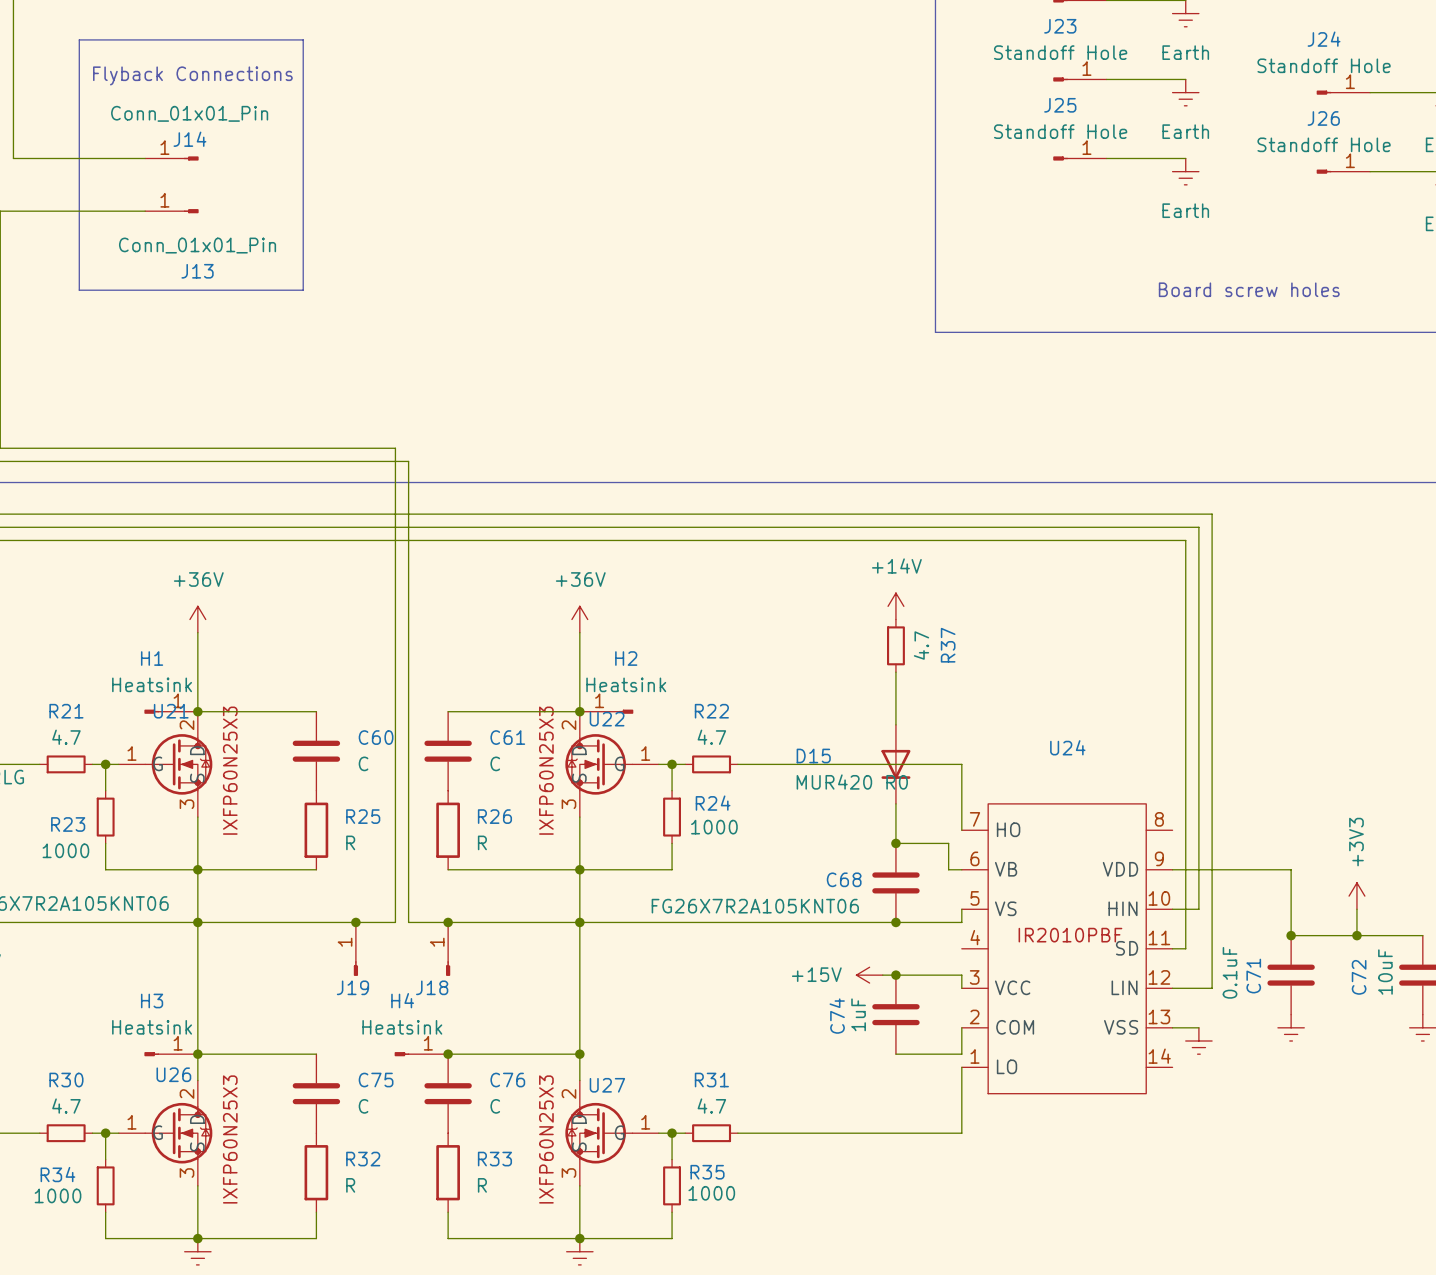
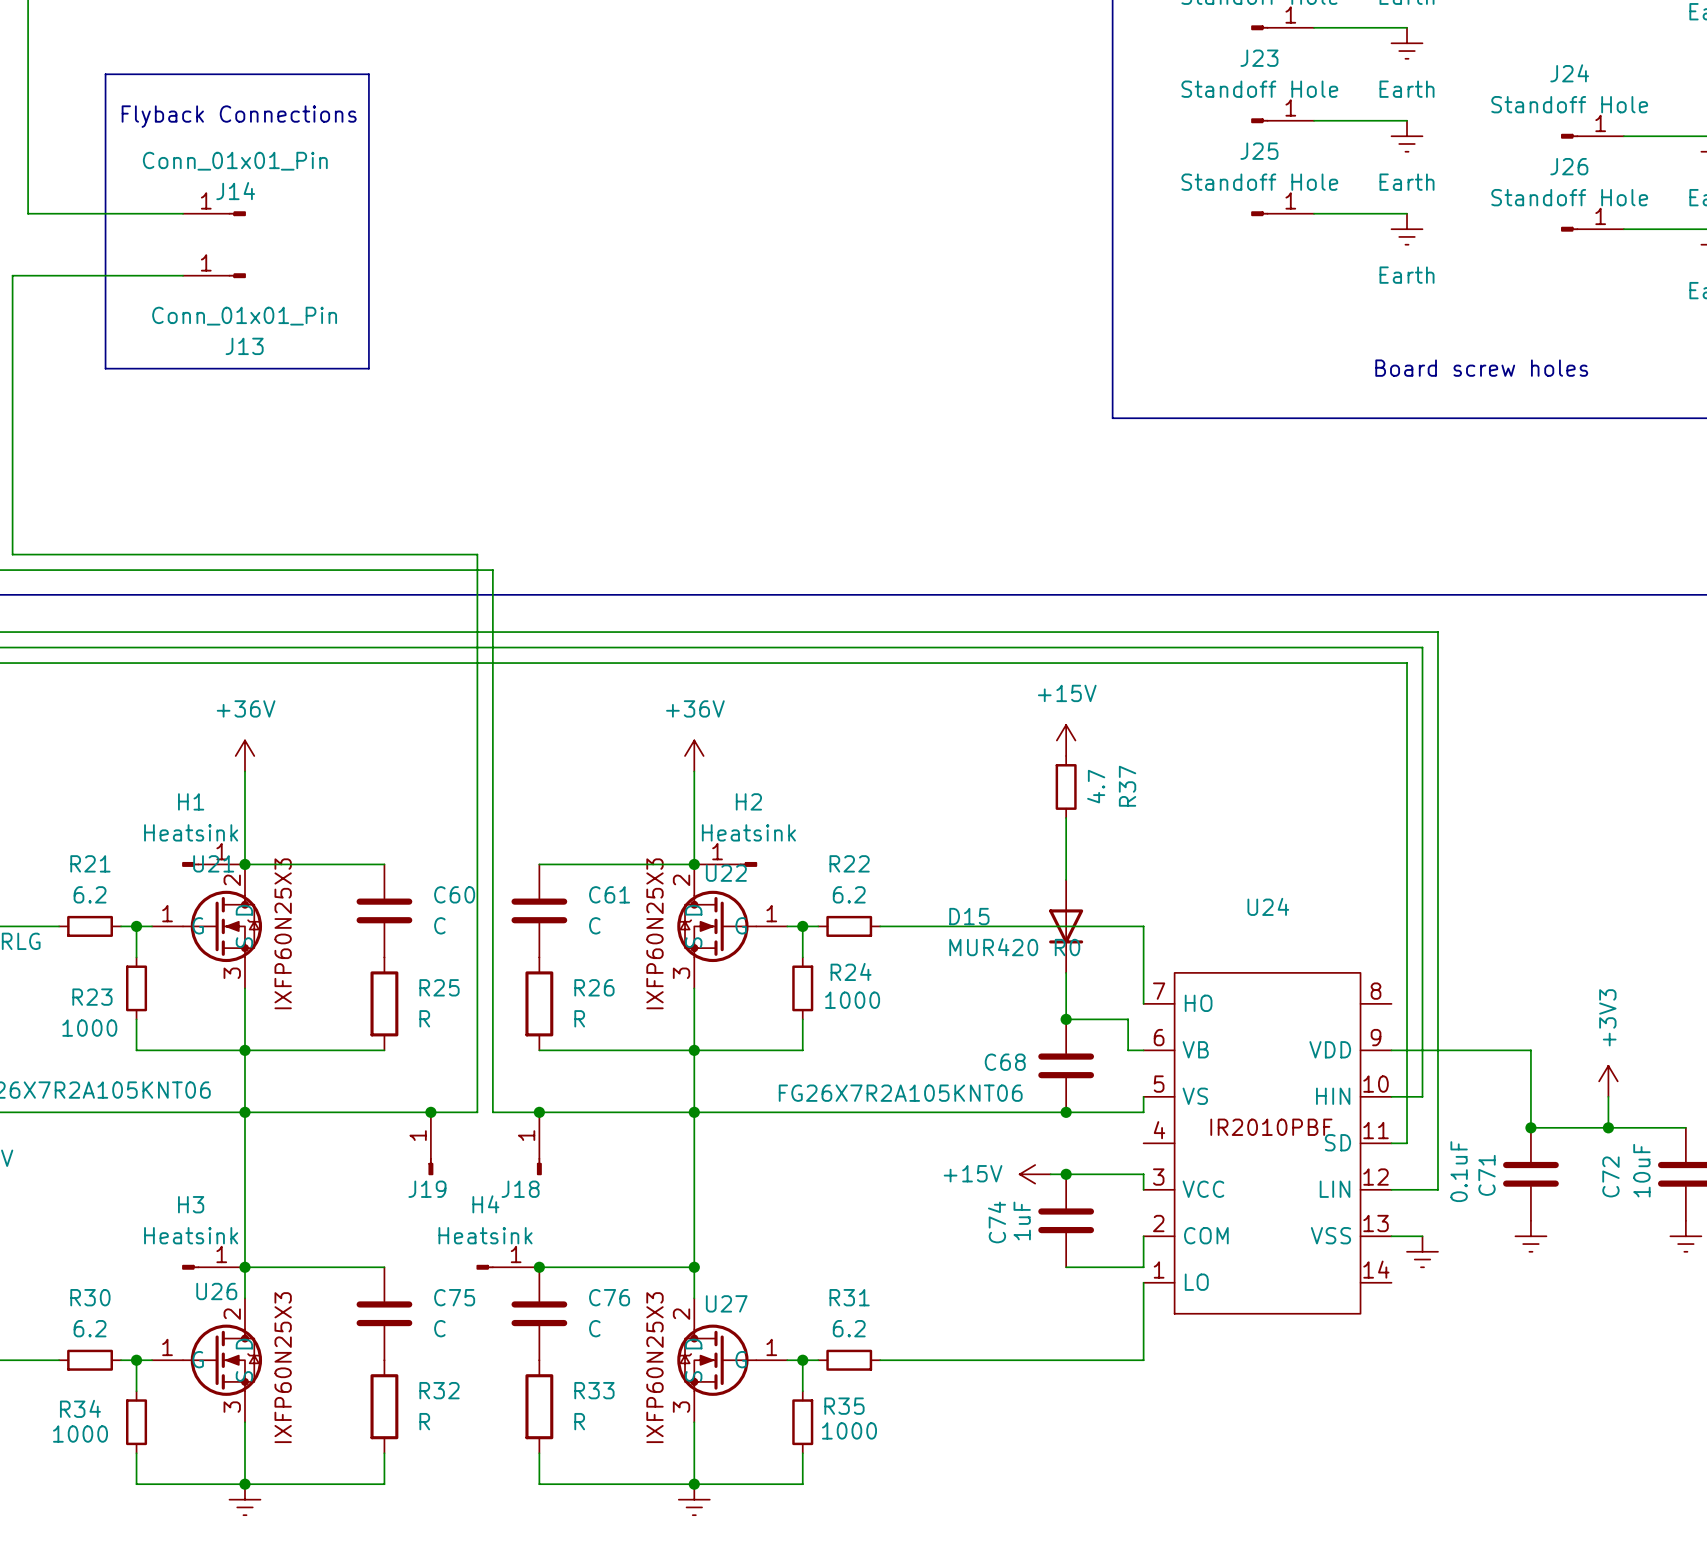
power symbol: +14V (895, 606) -> +15V (1066, 740)
R21 value: 4.7 (66, 737) -> 6.2 (90, 894)
R22 value: 4.7 (711, 737) -> 6.2 (849, 894)
R30 value: 4.7 (66, 1106) -> 6.2 (90, 1328)
R31 value: 4.7 (711, 1106) -> 6.2 (849, 1328)

